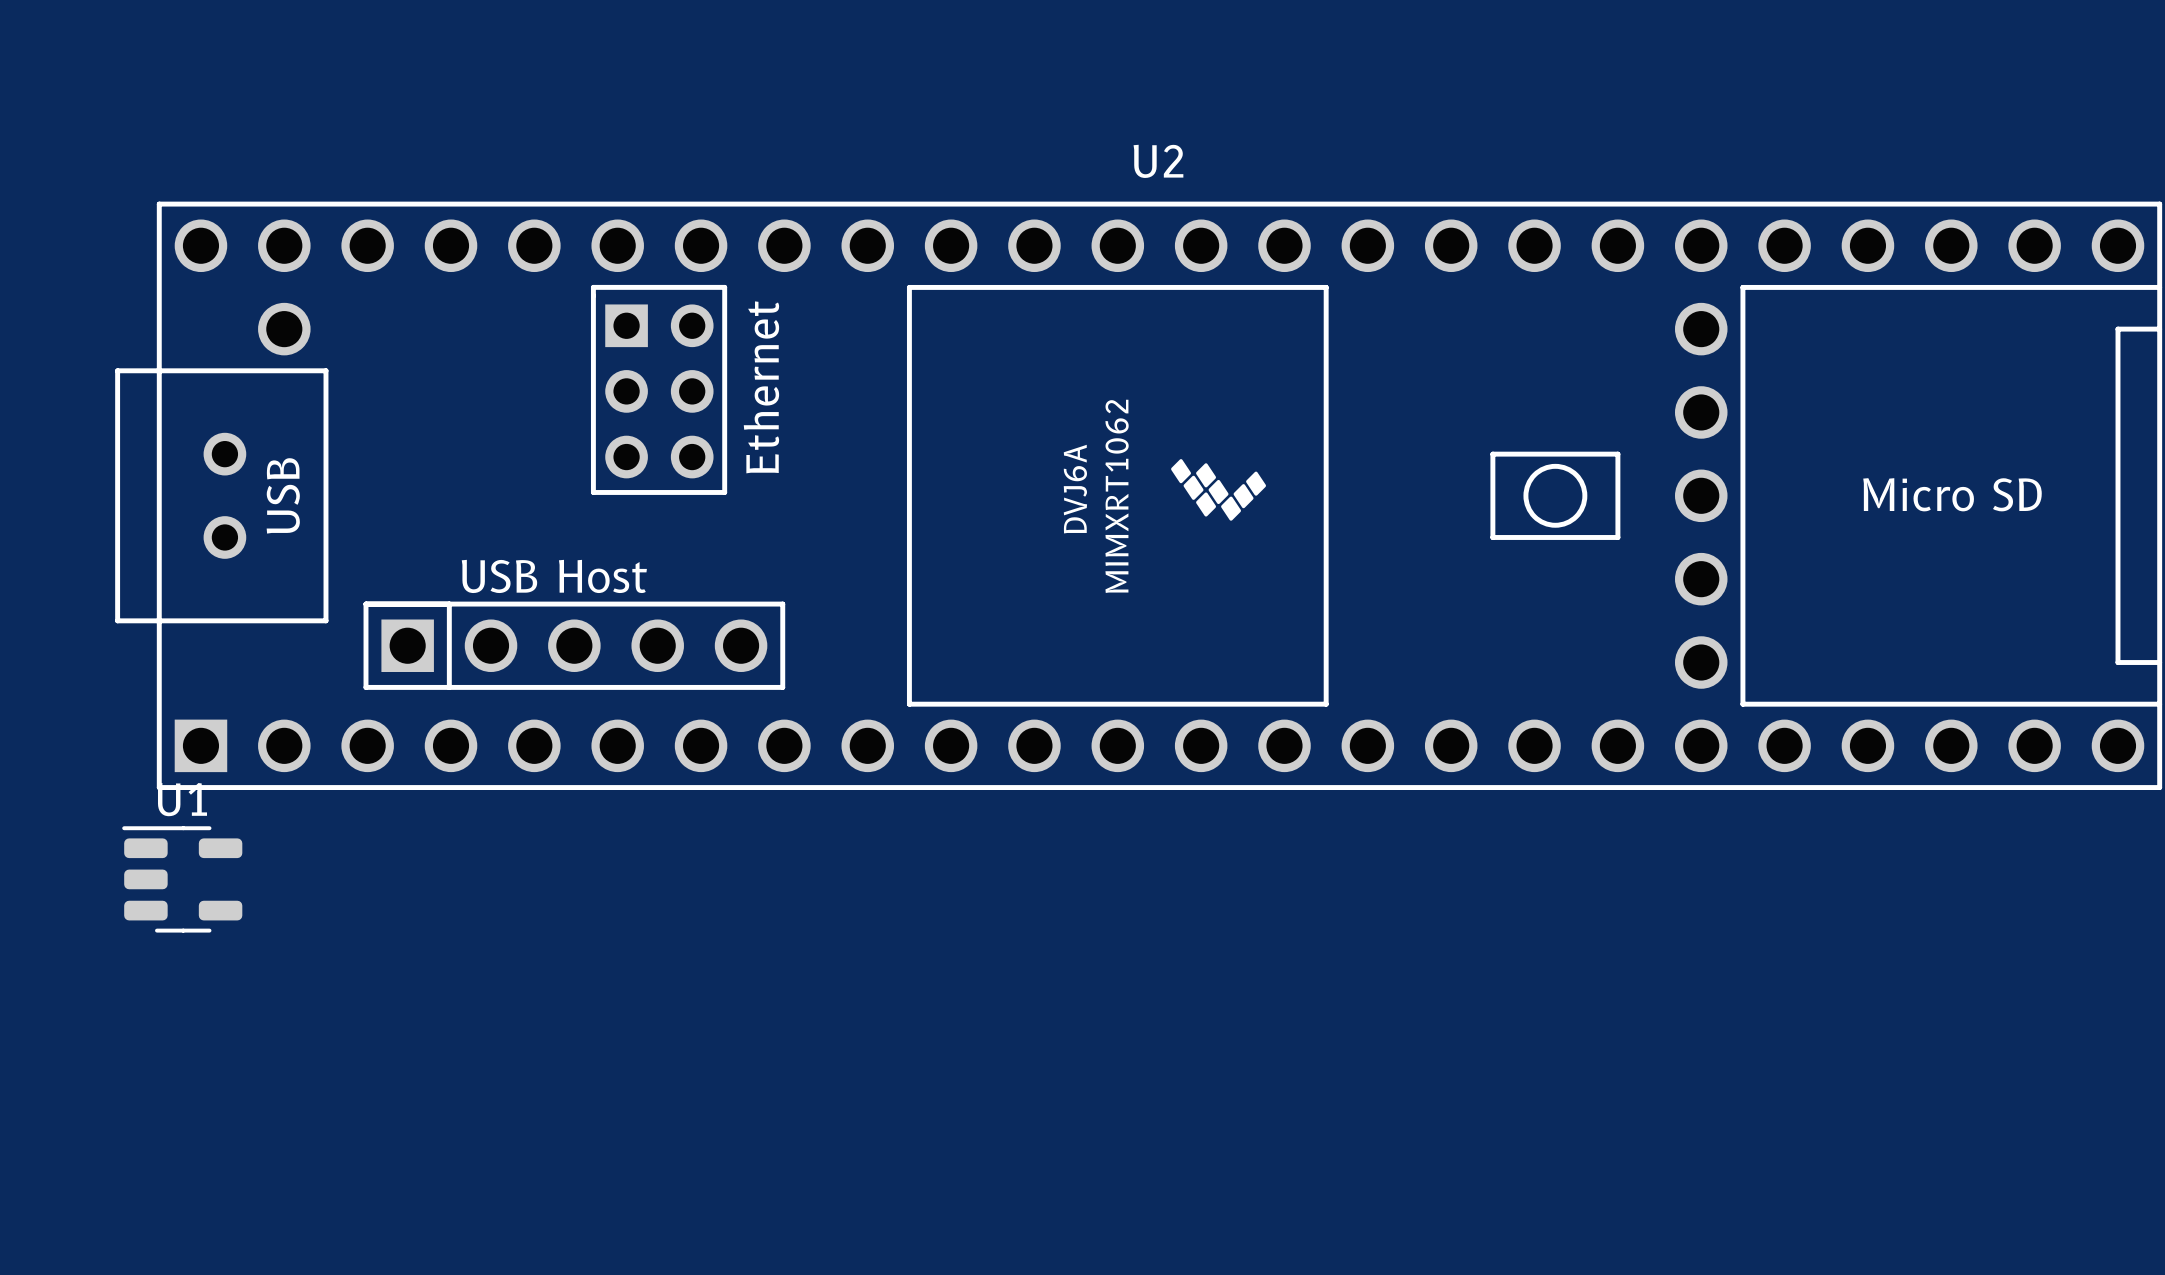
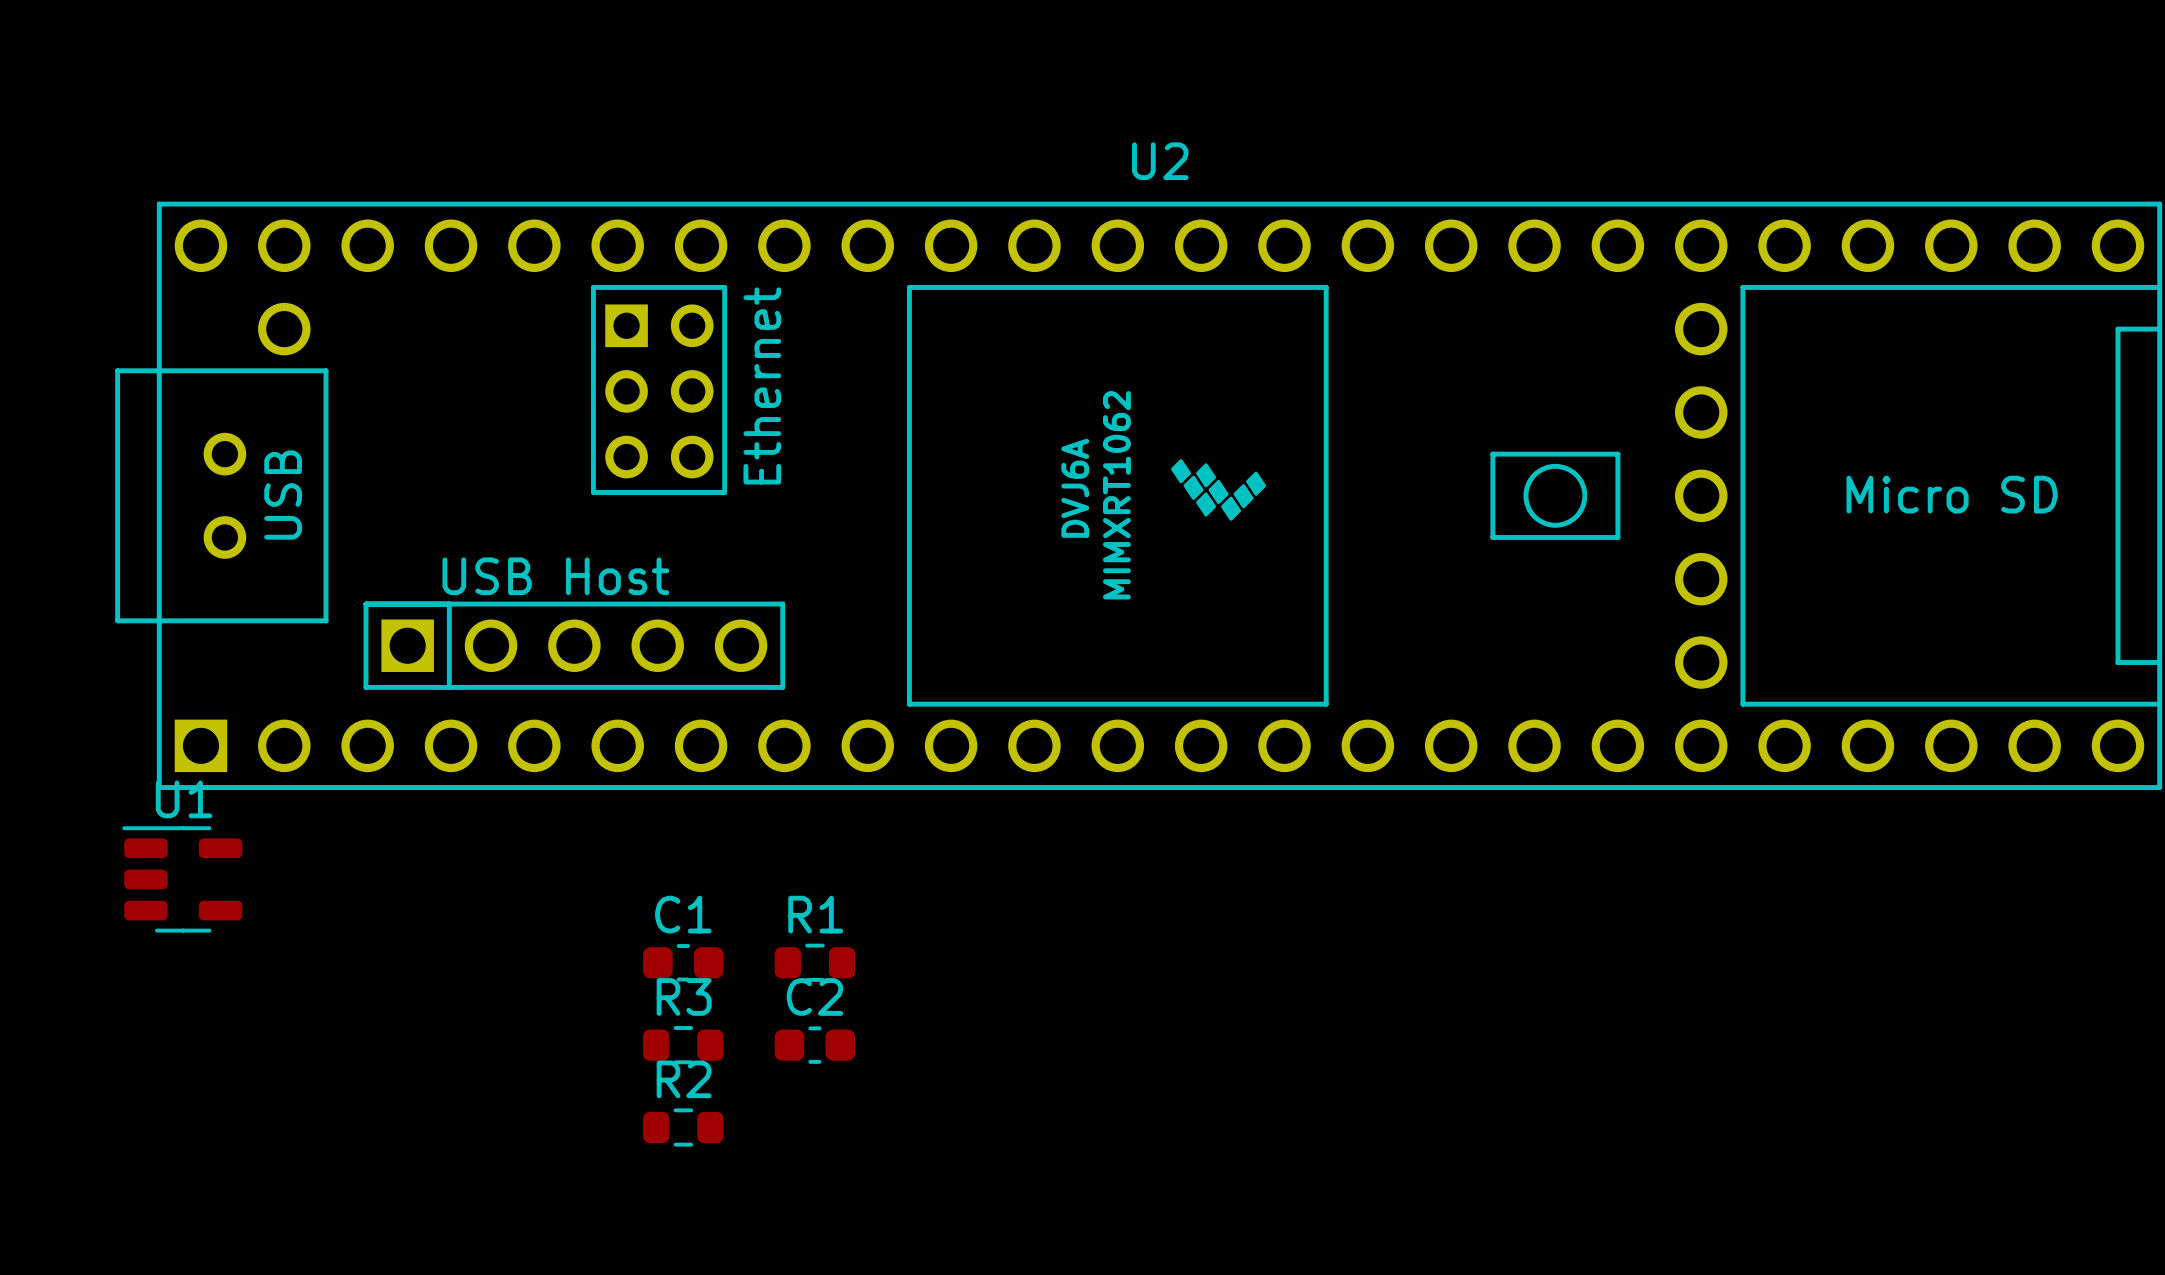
C1: none -> (683, 962)
R1: none -> (814, 962)
R3: none -> (683, 1045)
C2: none -> (814, 1045)
R2: none -> (683, 1127)

